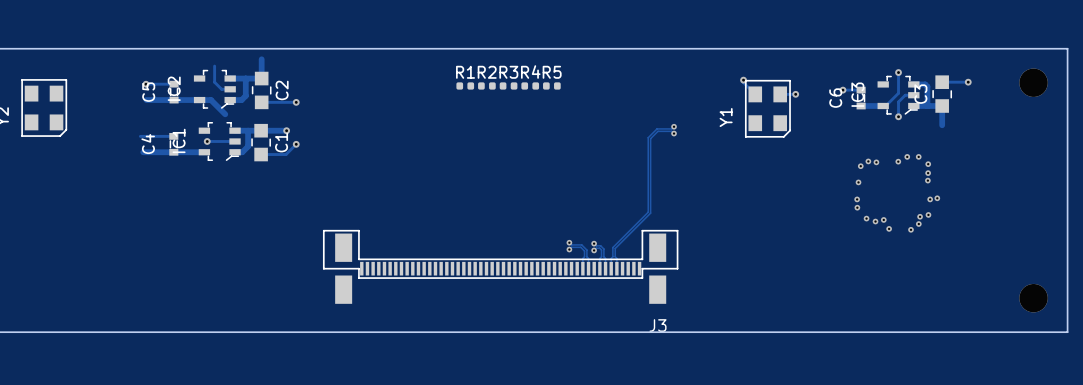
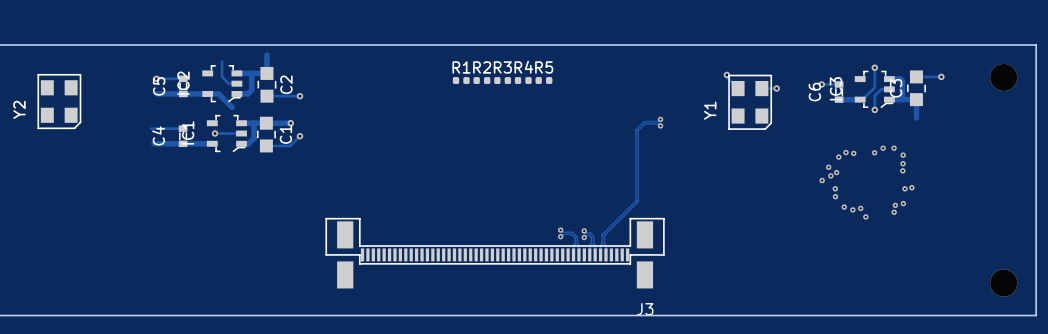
via: none -> (828, 167)
via: none -> (830, 175)
via: none -> (822, 180)
via: (911, 229) -> none

